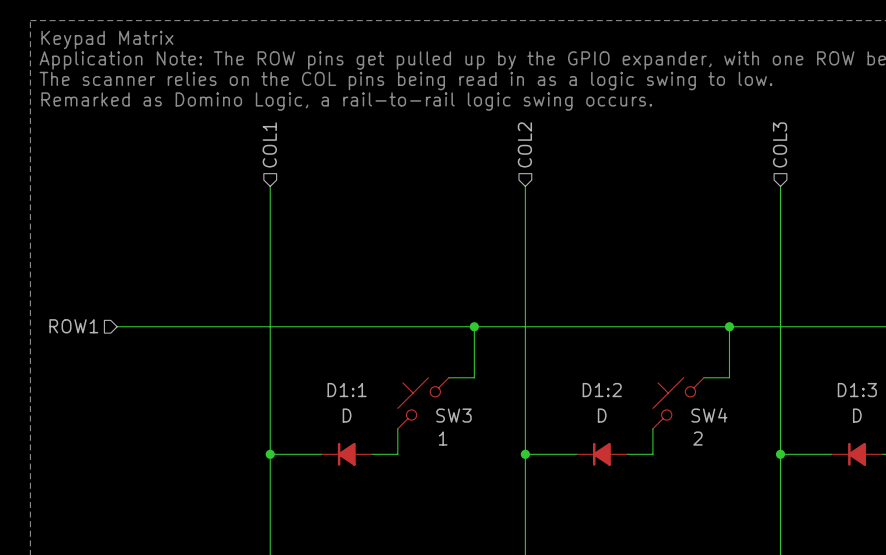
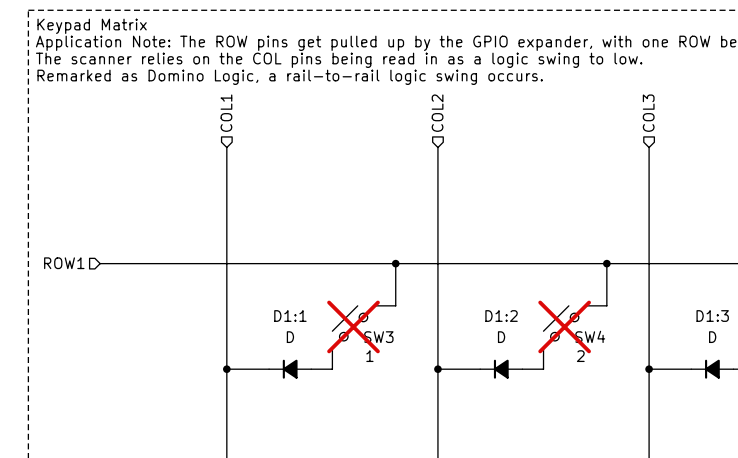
SW3 do-not-place cross: none -> (353, 326)
SW4 do-not-place cross: none -> (564, 326)

